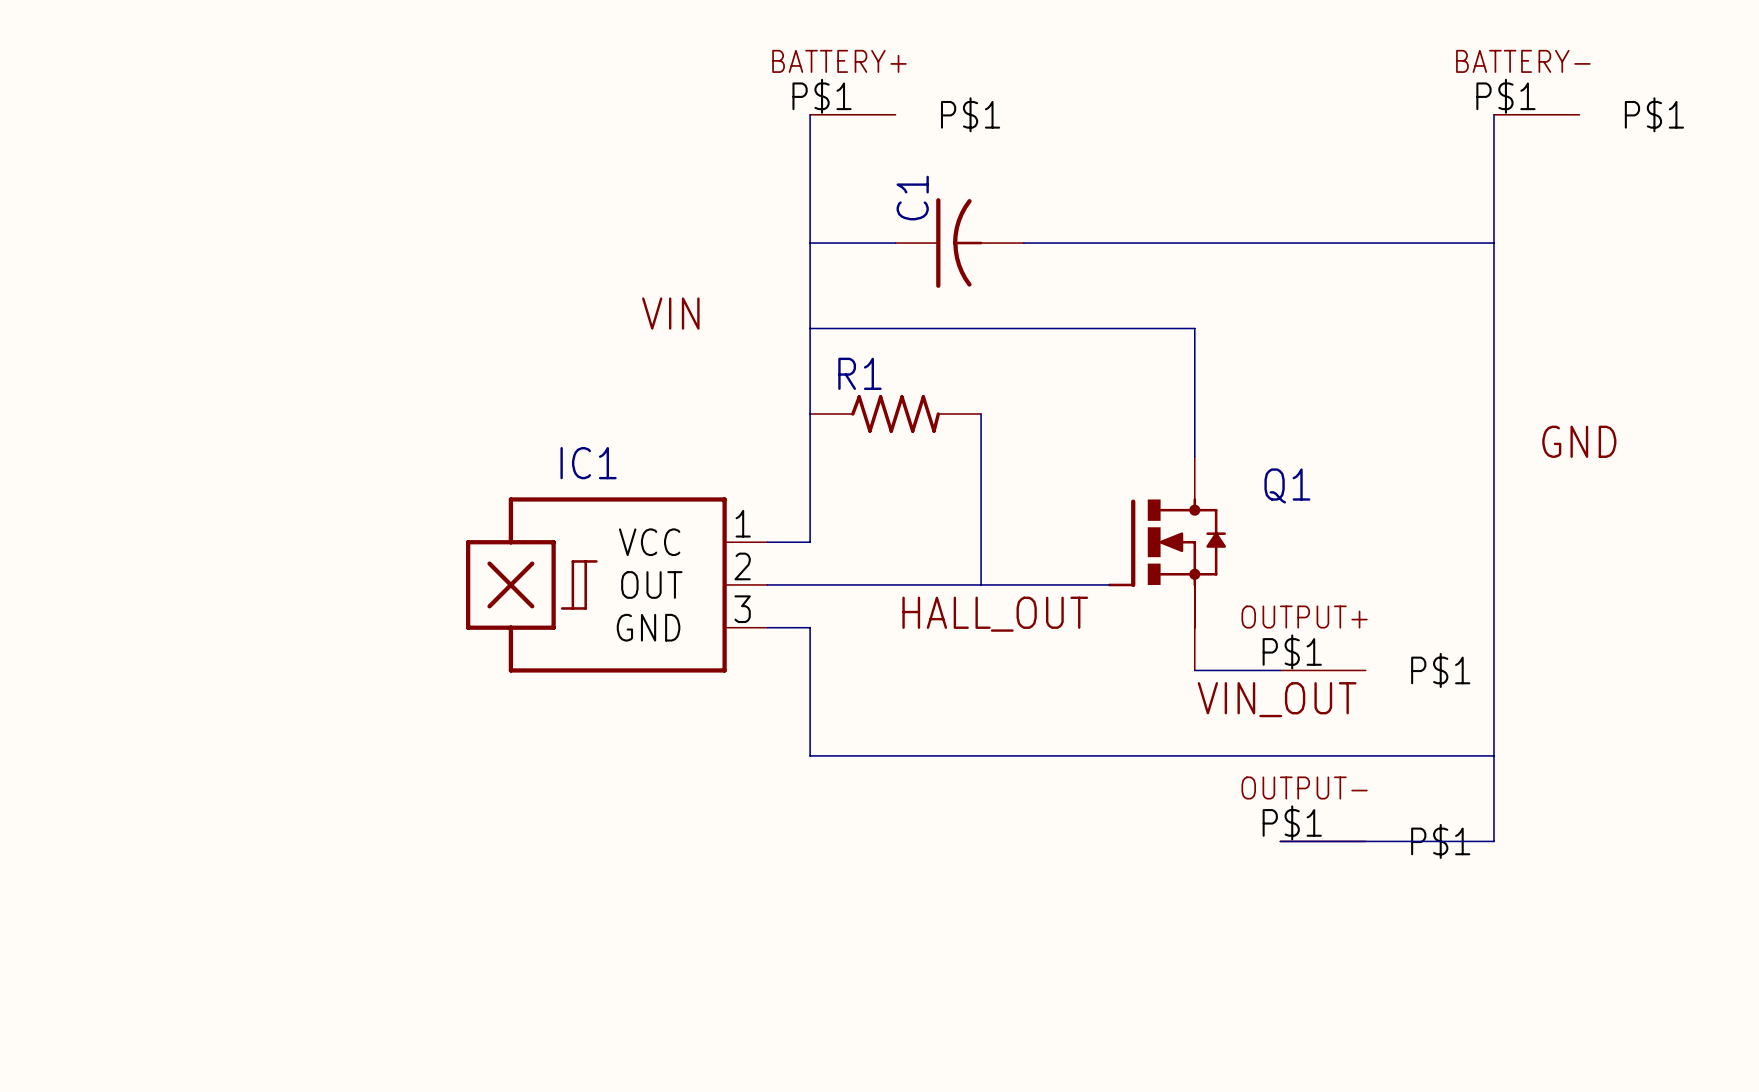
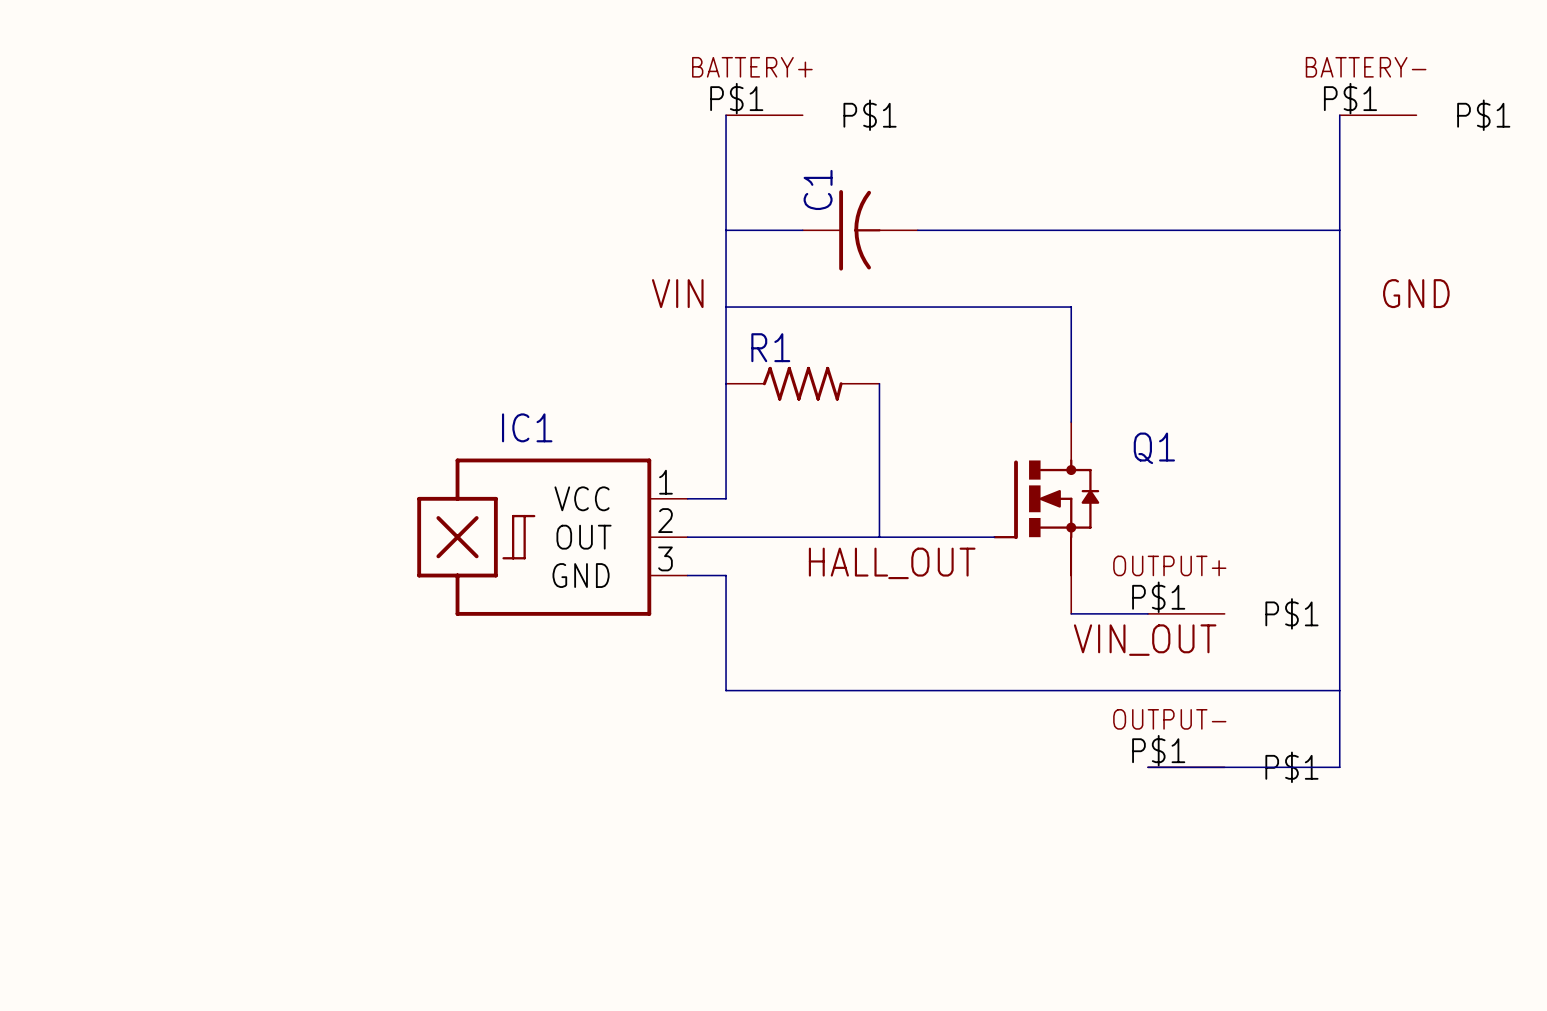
label position: VIN (670, 313) -> VIN (677, 293)
label position: GND (1579, 441) -> GND (1416, 293)

